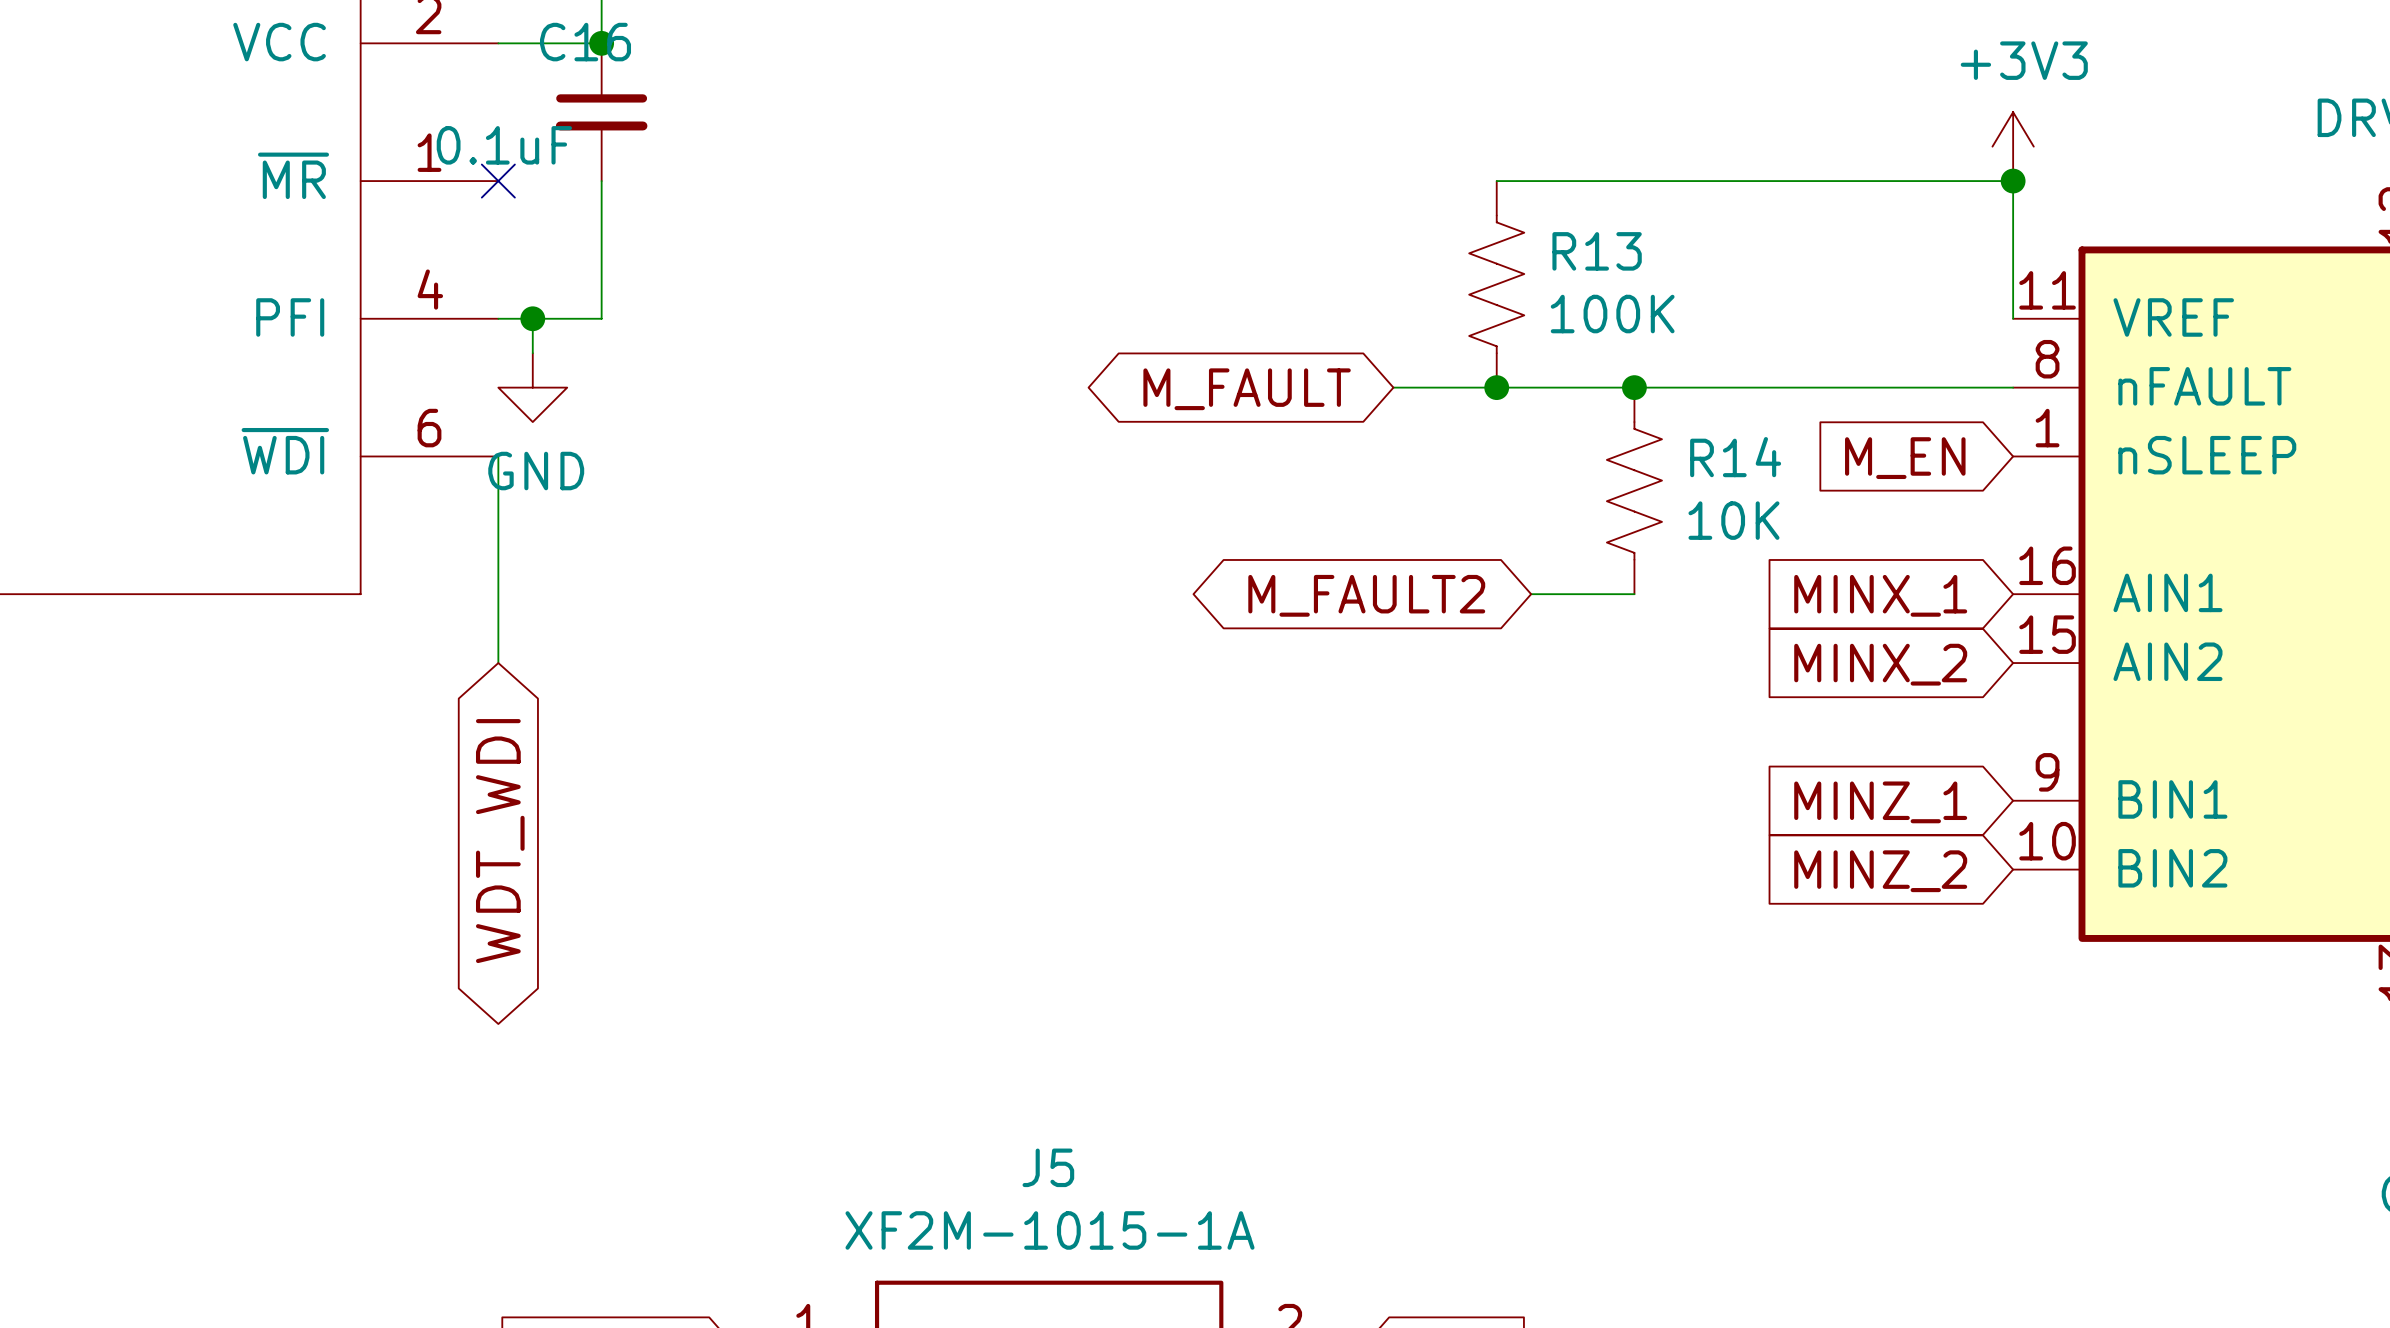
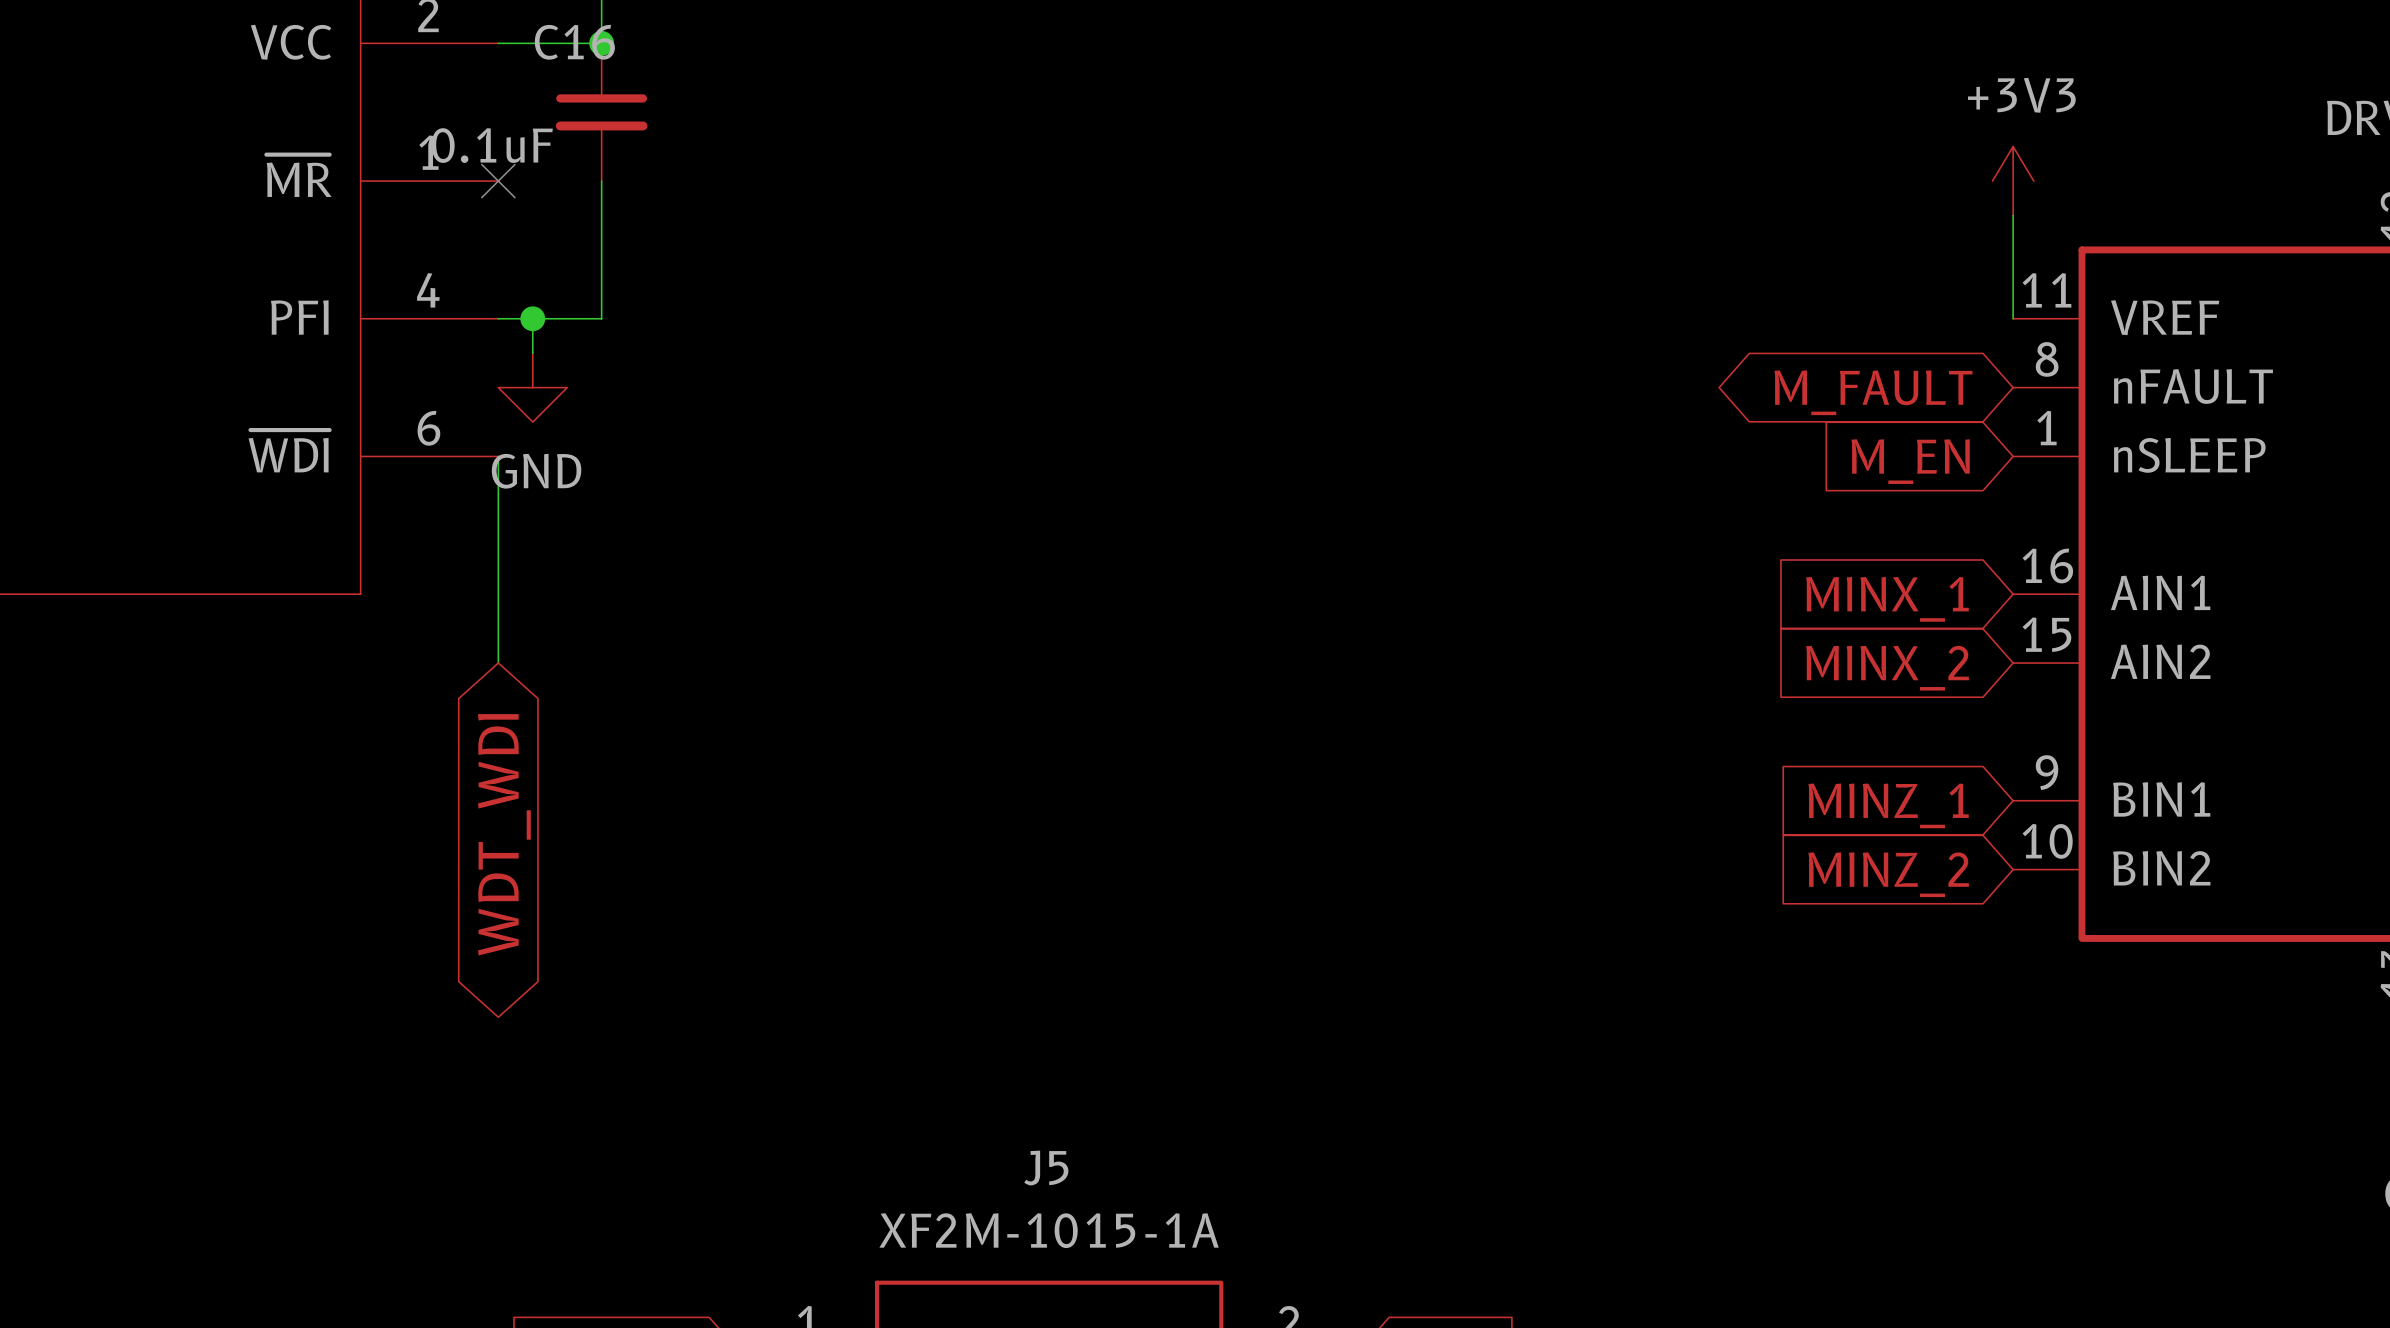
power symbol position: +3V3 (2013, 146) -> +3V3 (2013, 181)
wire: (1496, 181) (2013, 181) (2013, 215) -> none
junction: (2013, 181) -> none
R13: 100K (1496, 284) -> none
wire: (1393, 387) (2013, 387) -> none
junction: (1496, 387) -> none
junction: (1634, 387) -> none
global label position: M_FAULT (1247, 389) -> M_FAULT (1873, 392)
R14: 10K (1634, 490) -> none
wire: (1531, 594) (1634, 594) -> none
global label: M_FAULT2 (1366, 595) -> none

